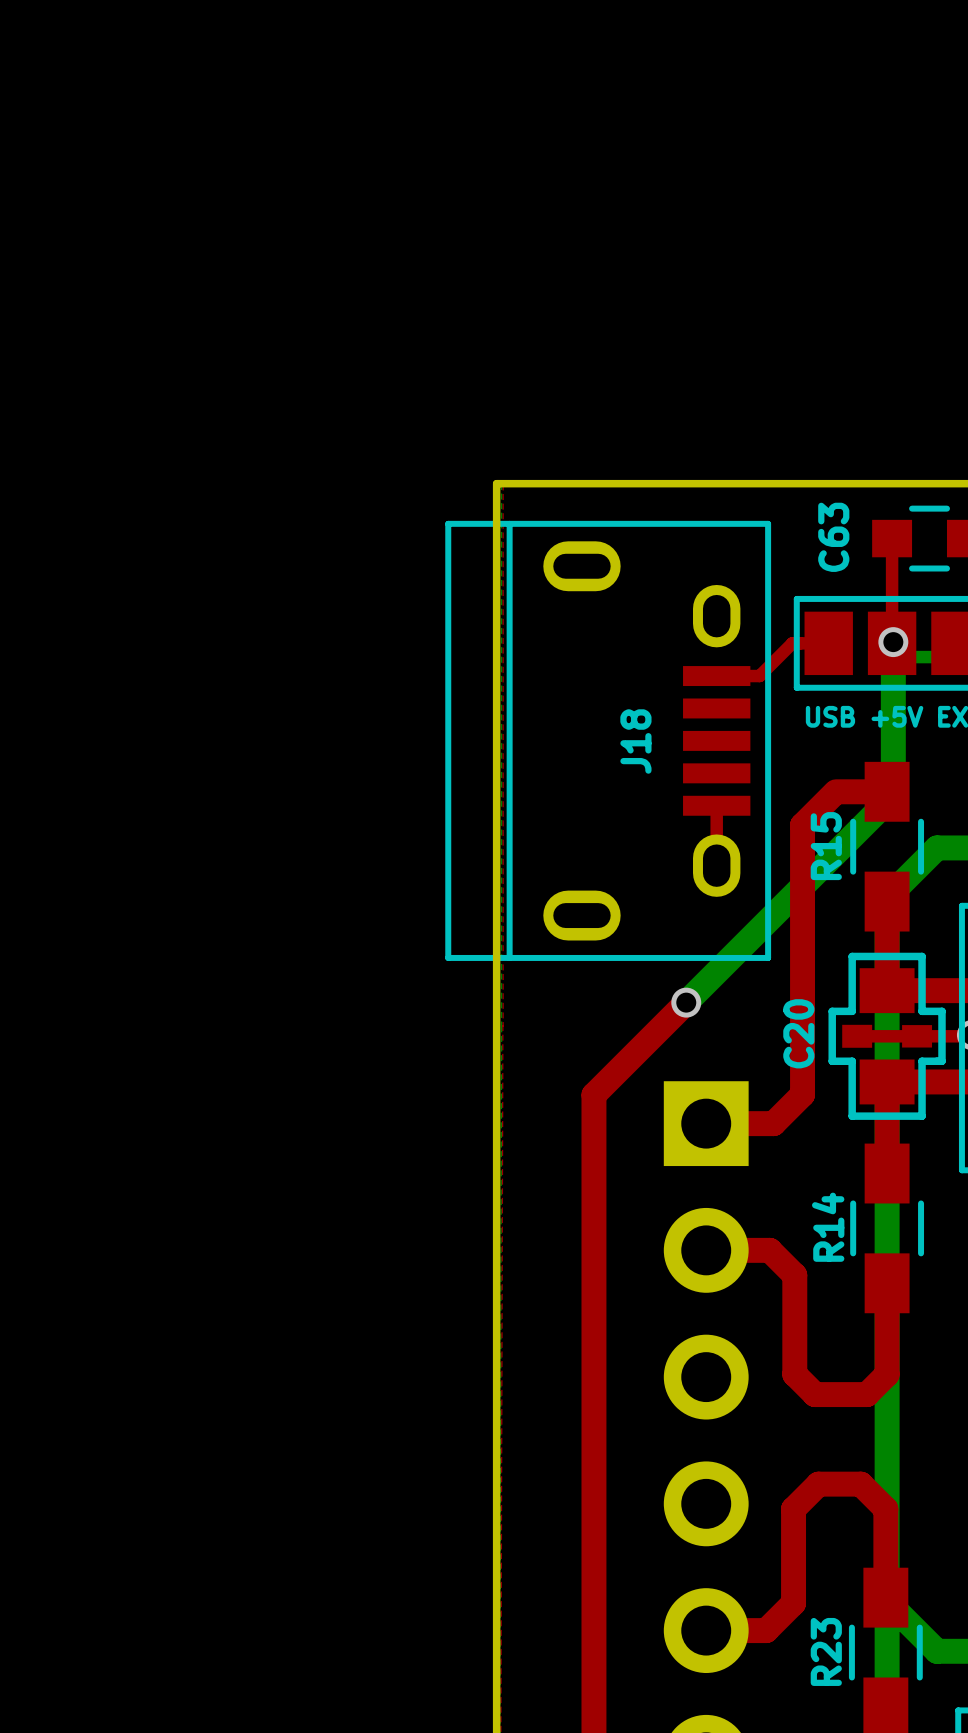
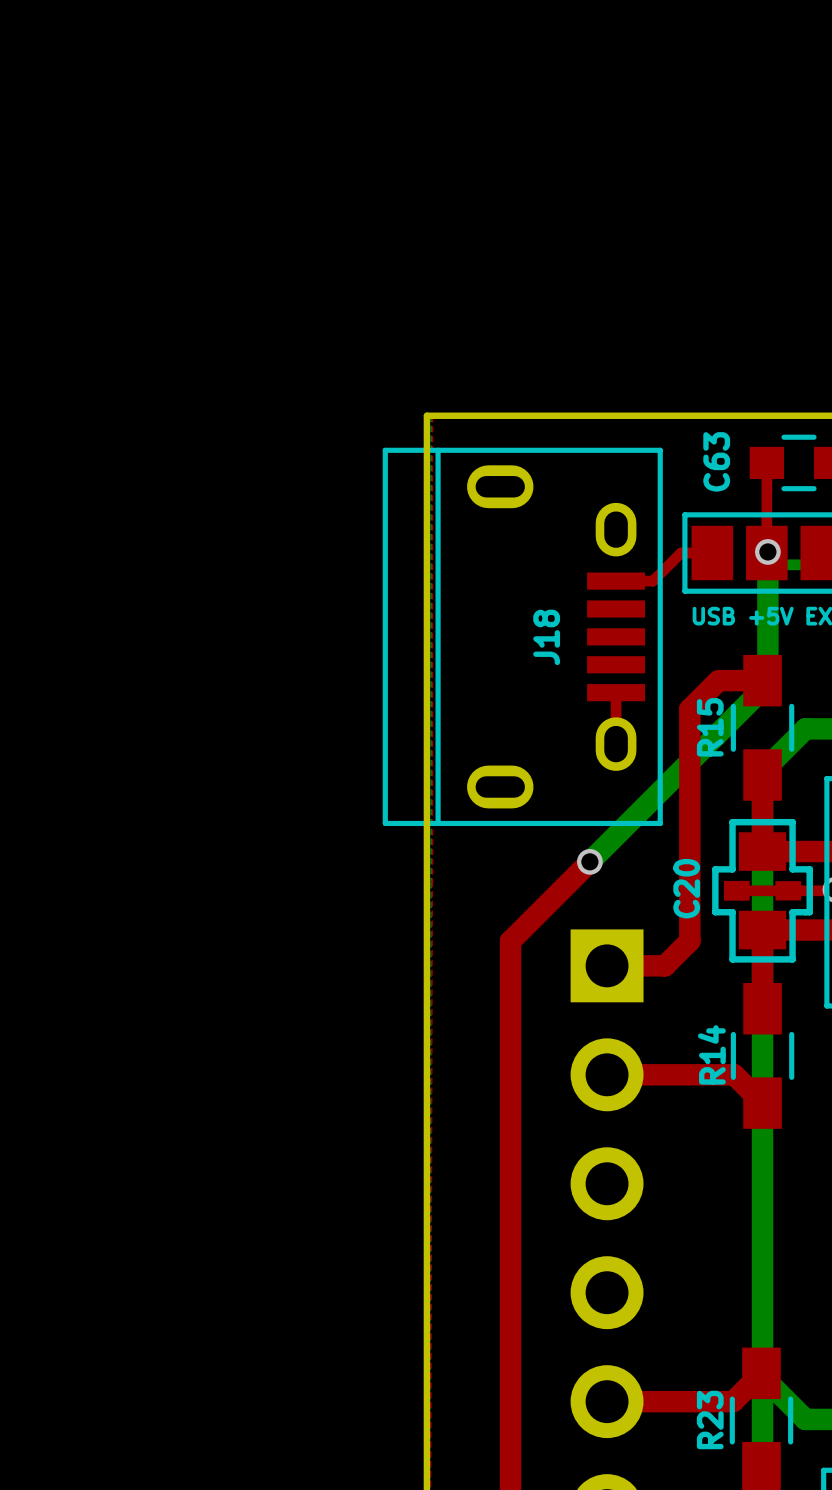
top track: (769, 1250) (794, 1275) (794, 1374) (815, 1394) (866, 1394) (887, 1374) (887, 1283) -> (661, 1074) (734, 1074) (762, 1103)
top track: (885, 1597) (885, 1509) (860, 1484) (818, 1484) (793, 1509) (793, 1603) (766, 1630) -> (761, 1373) (733, 1401) (658, 1401)

